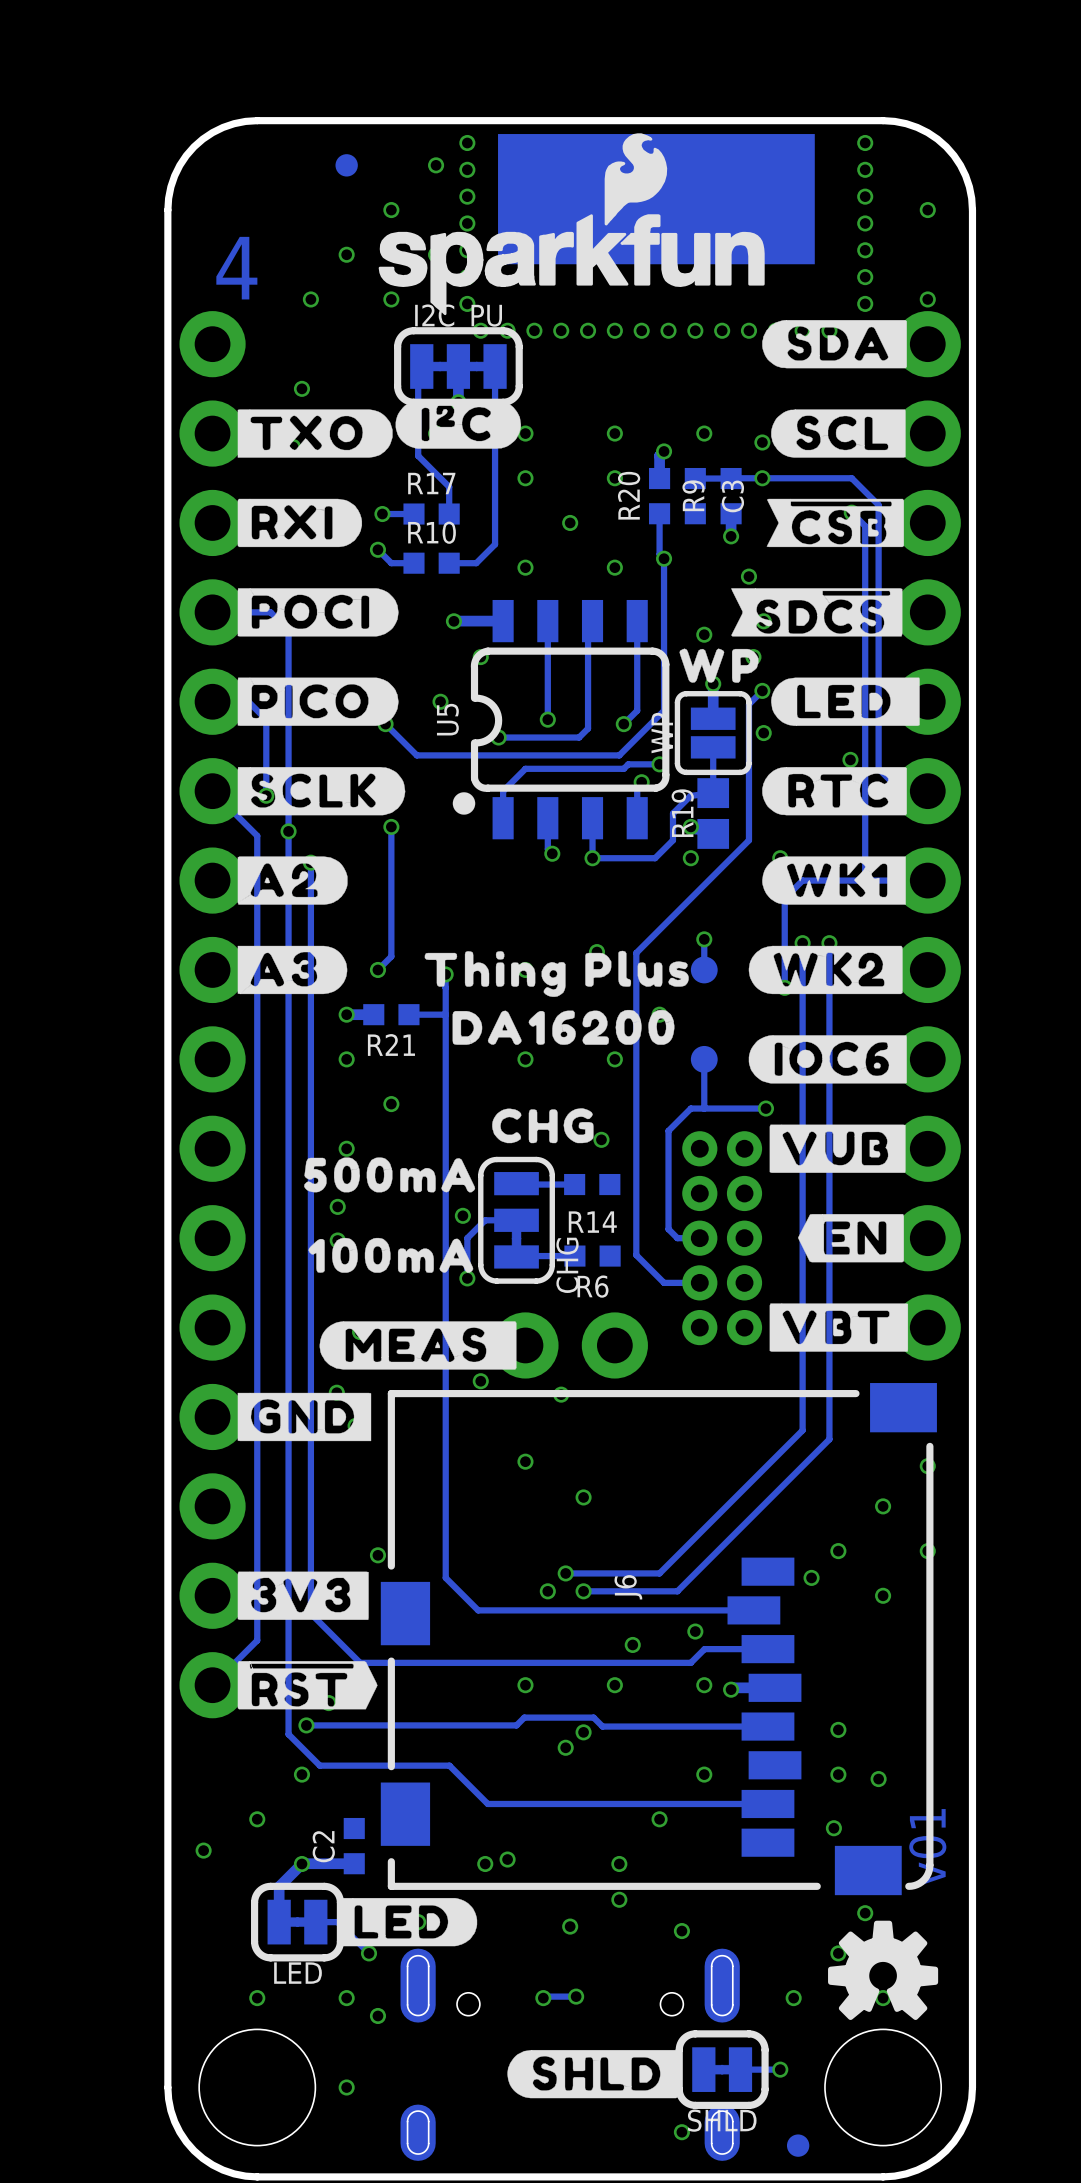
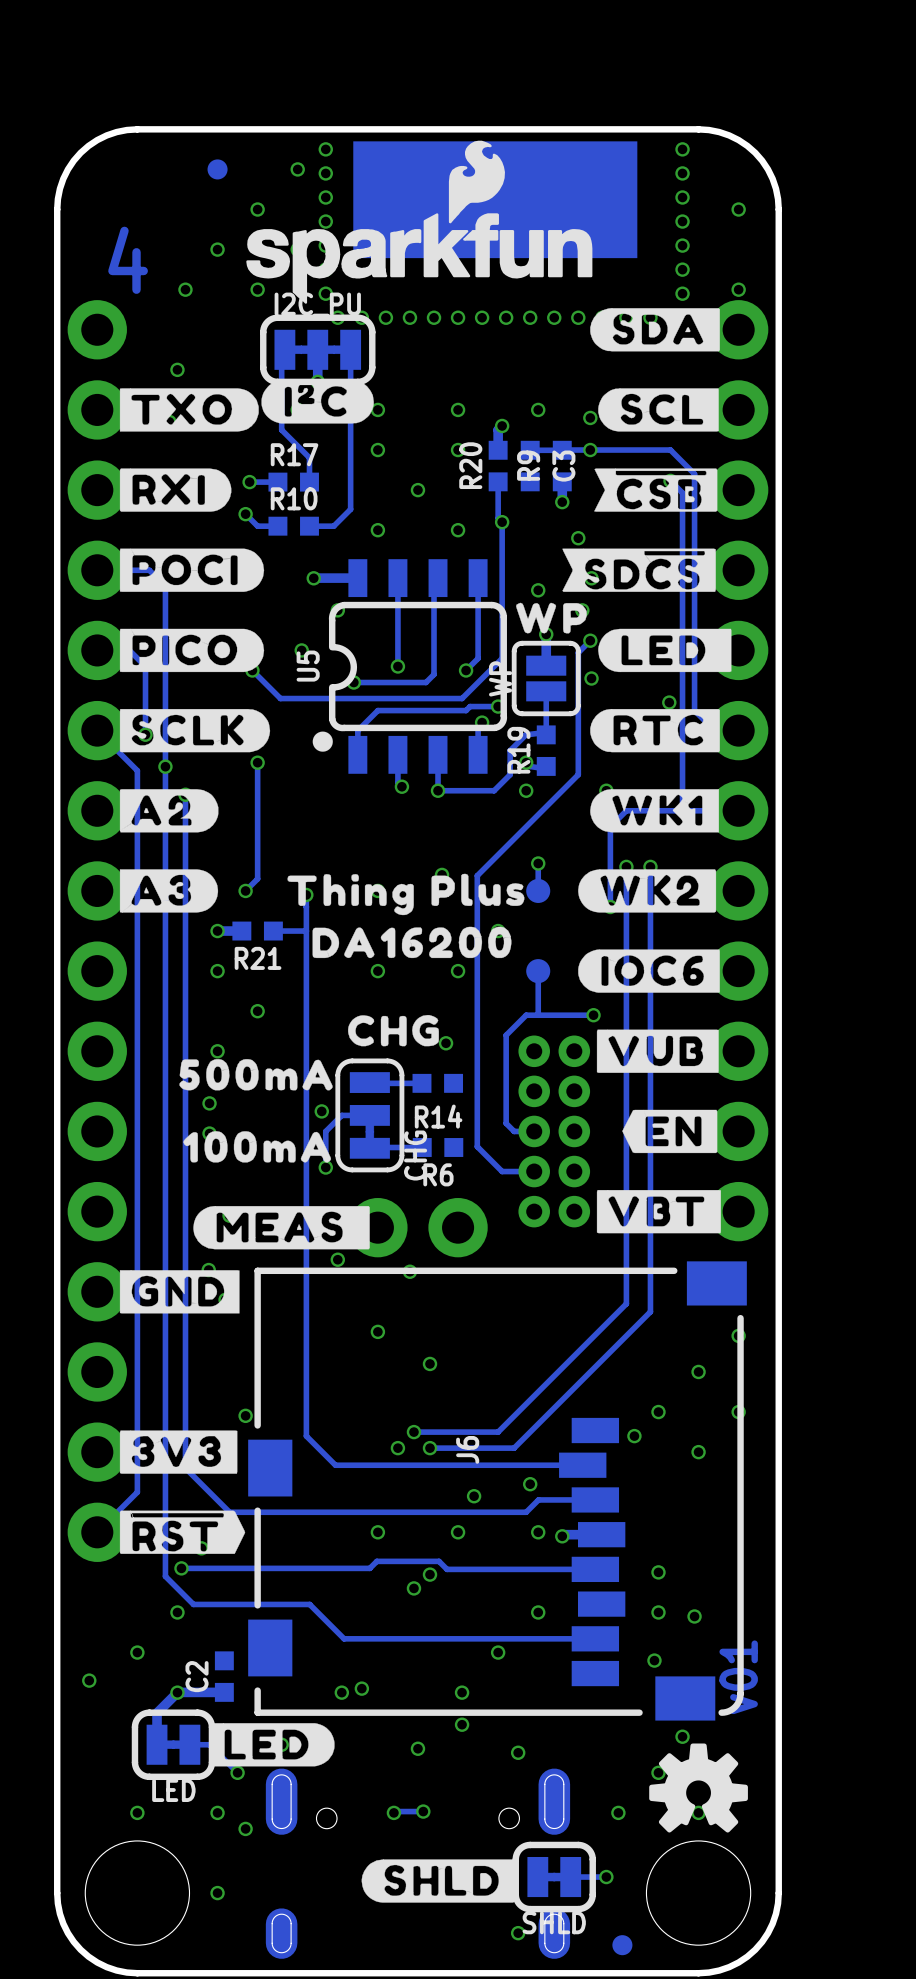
R19 footprint: [697, 778, 730, 849] -> [536, 725, 556, 776]

